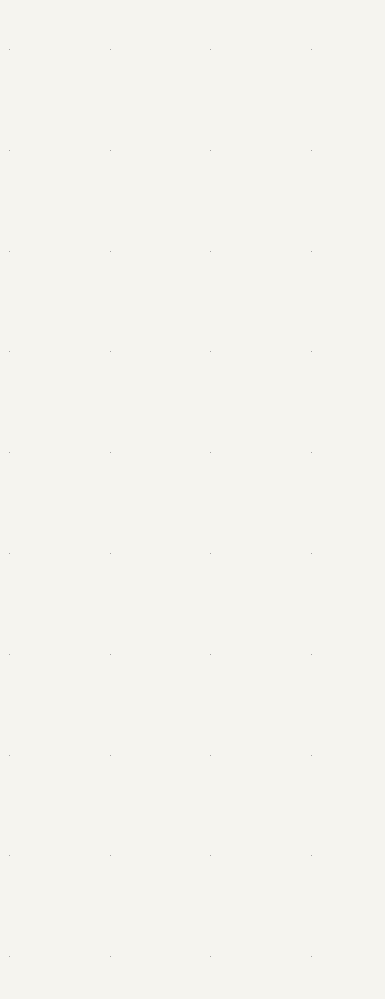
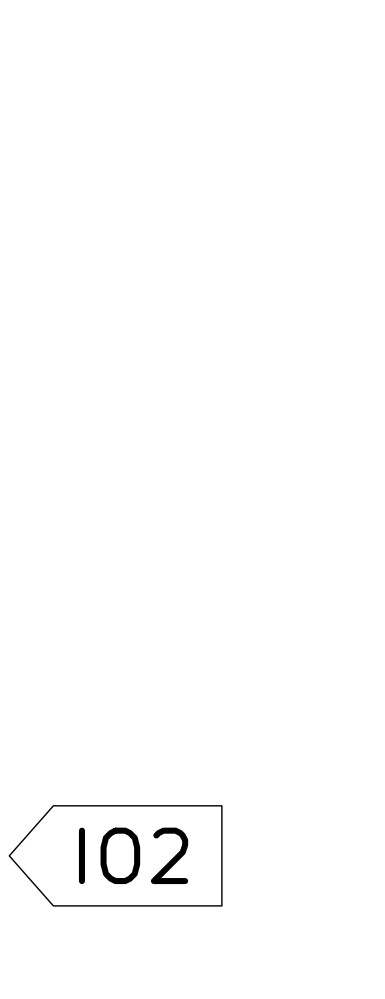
global label: none -> IO2 (133, 855)

